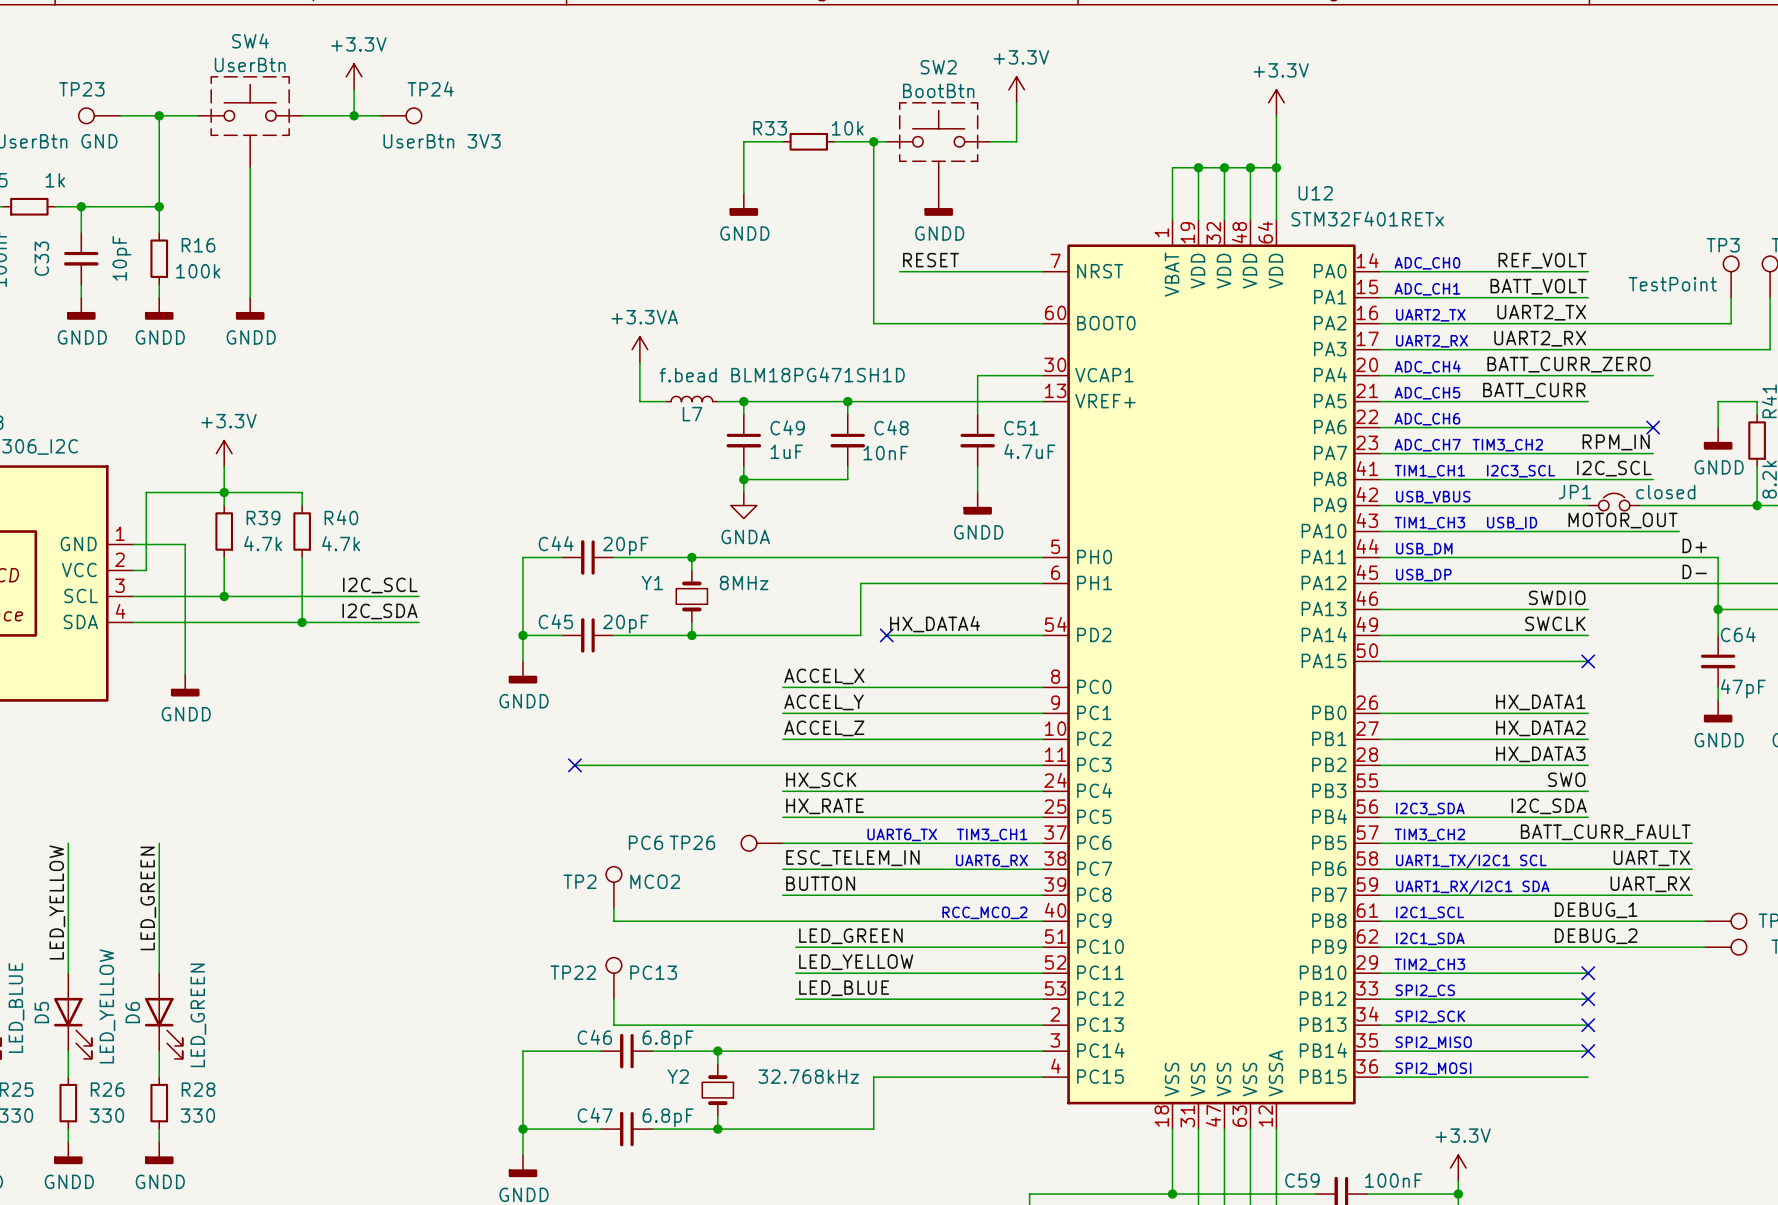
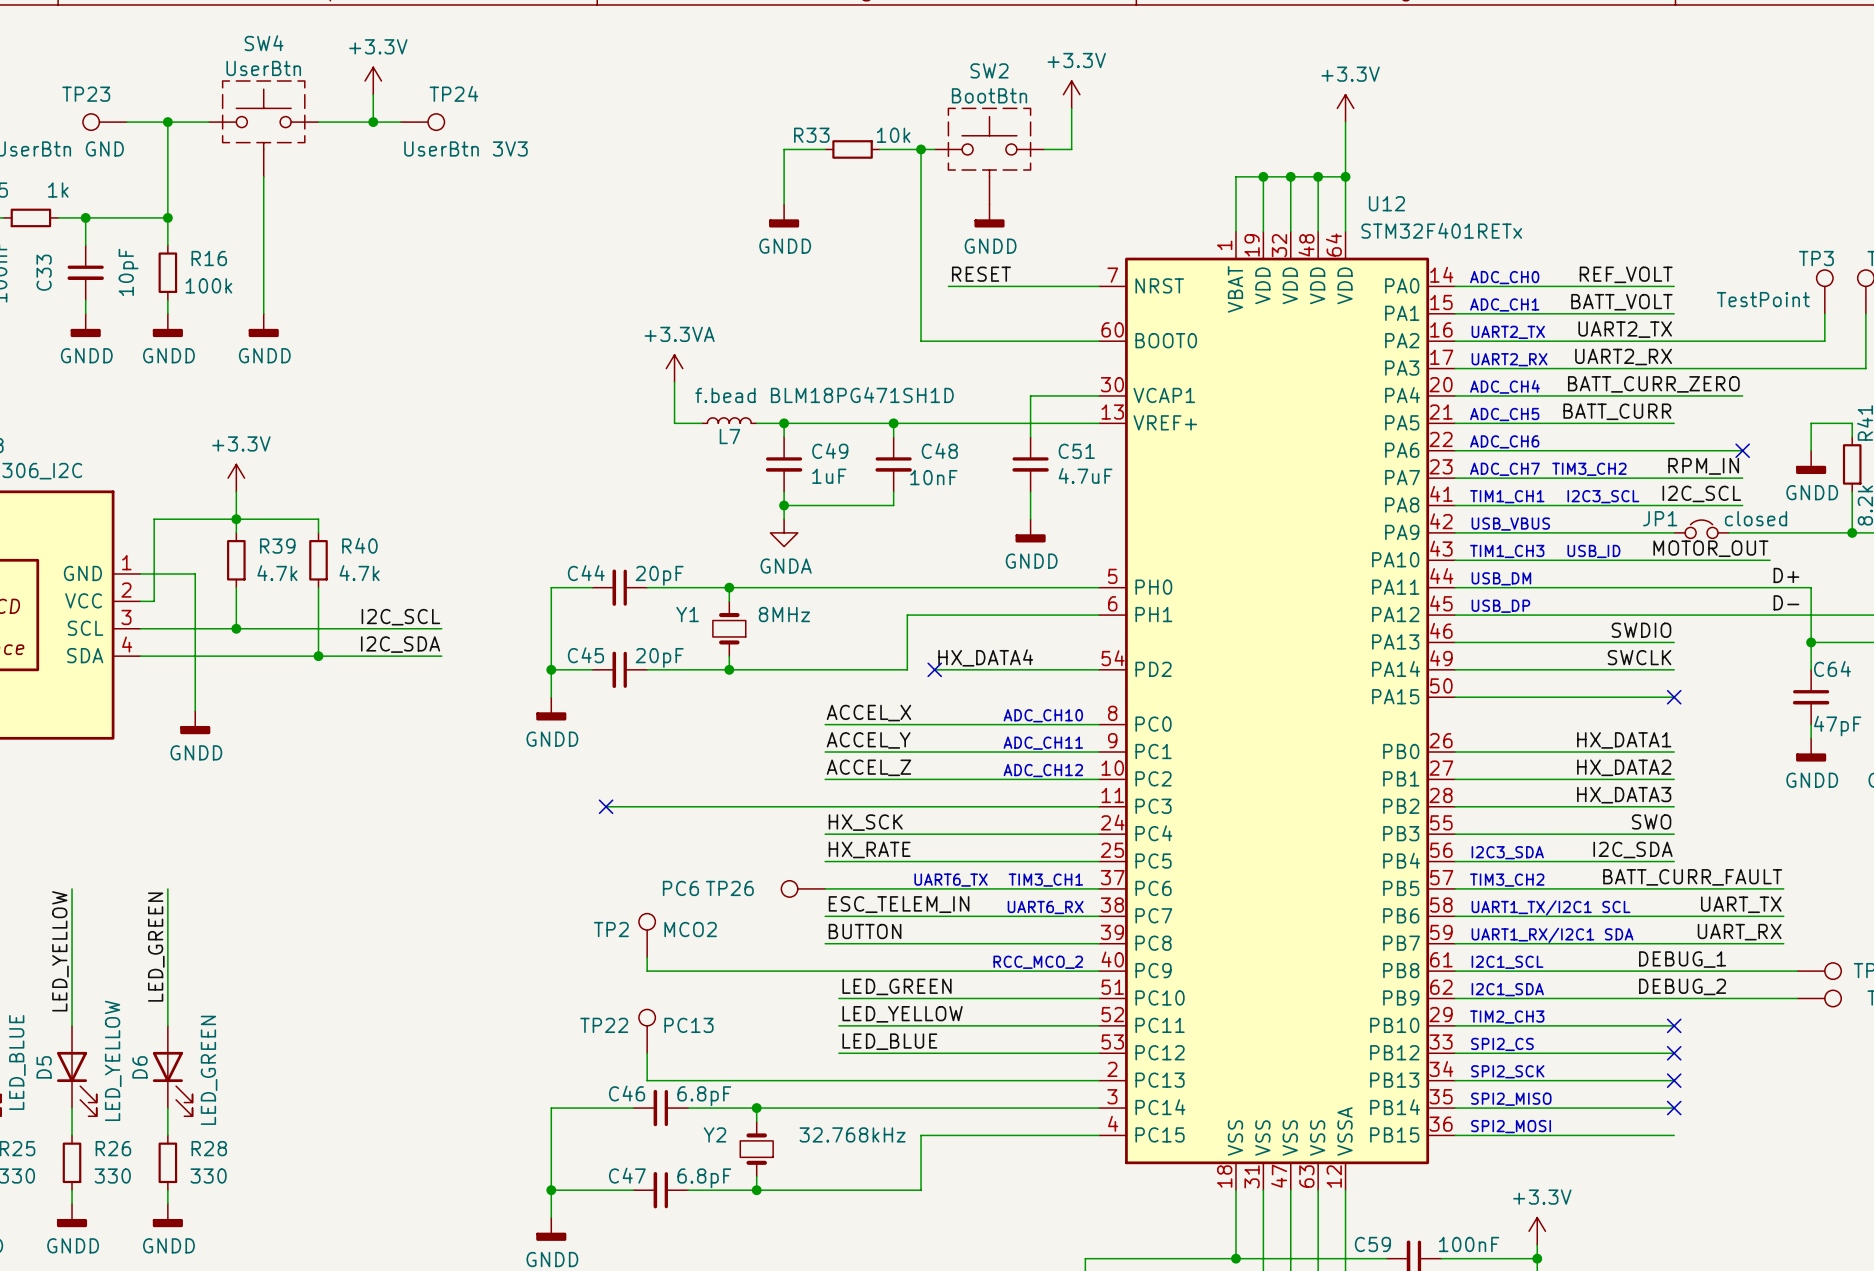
text: none -> ADC_CH10 (1043, 715)
text: none -> ADC_CH11 (1043, 743)
text: none -> ADC_CH12 (1043, 770)

